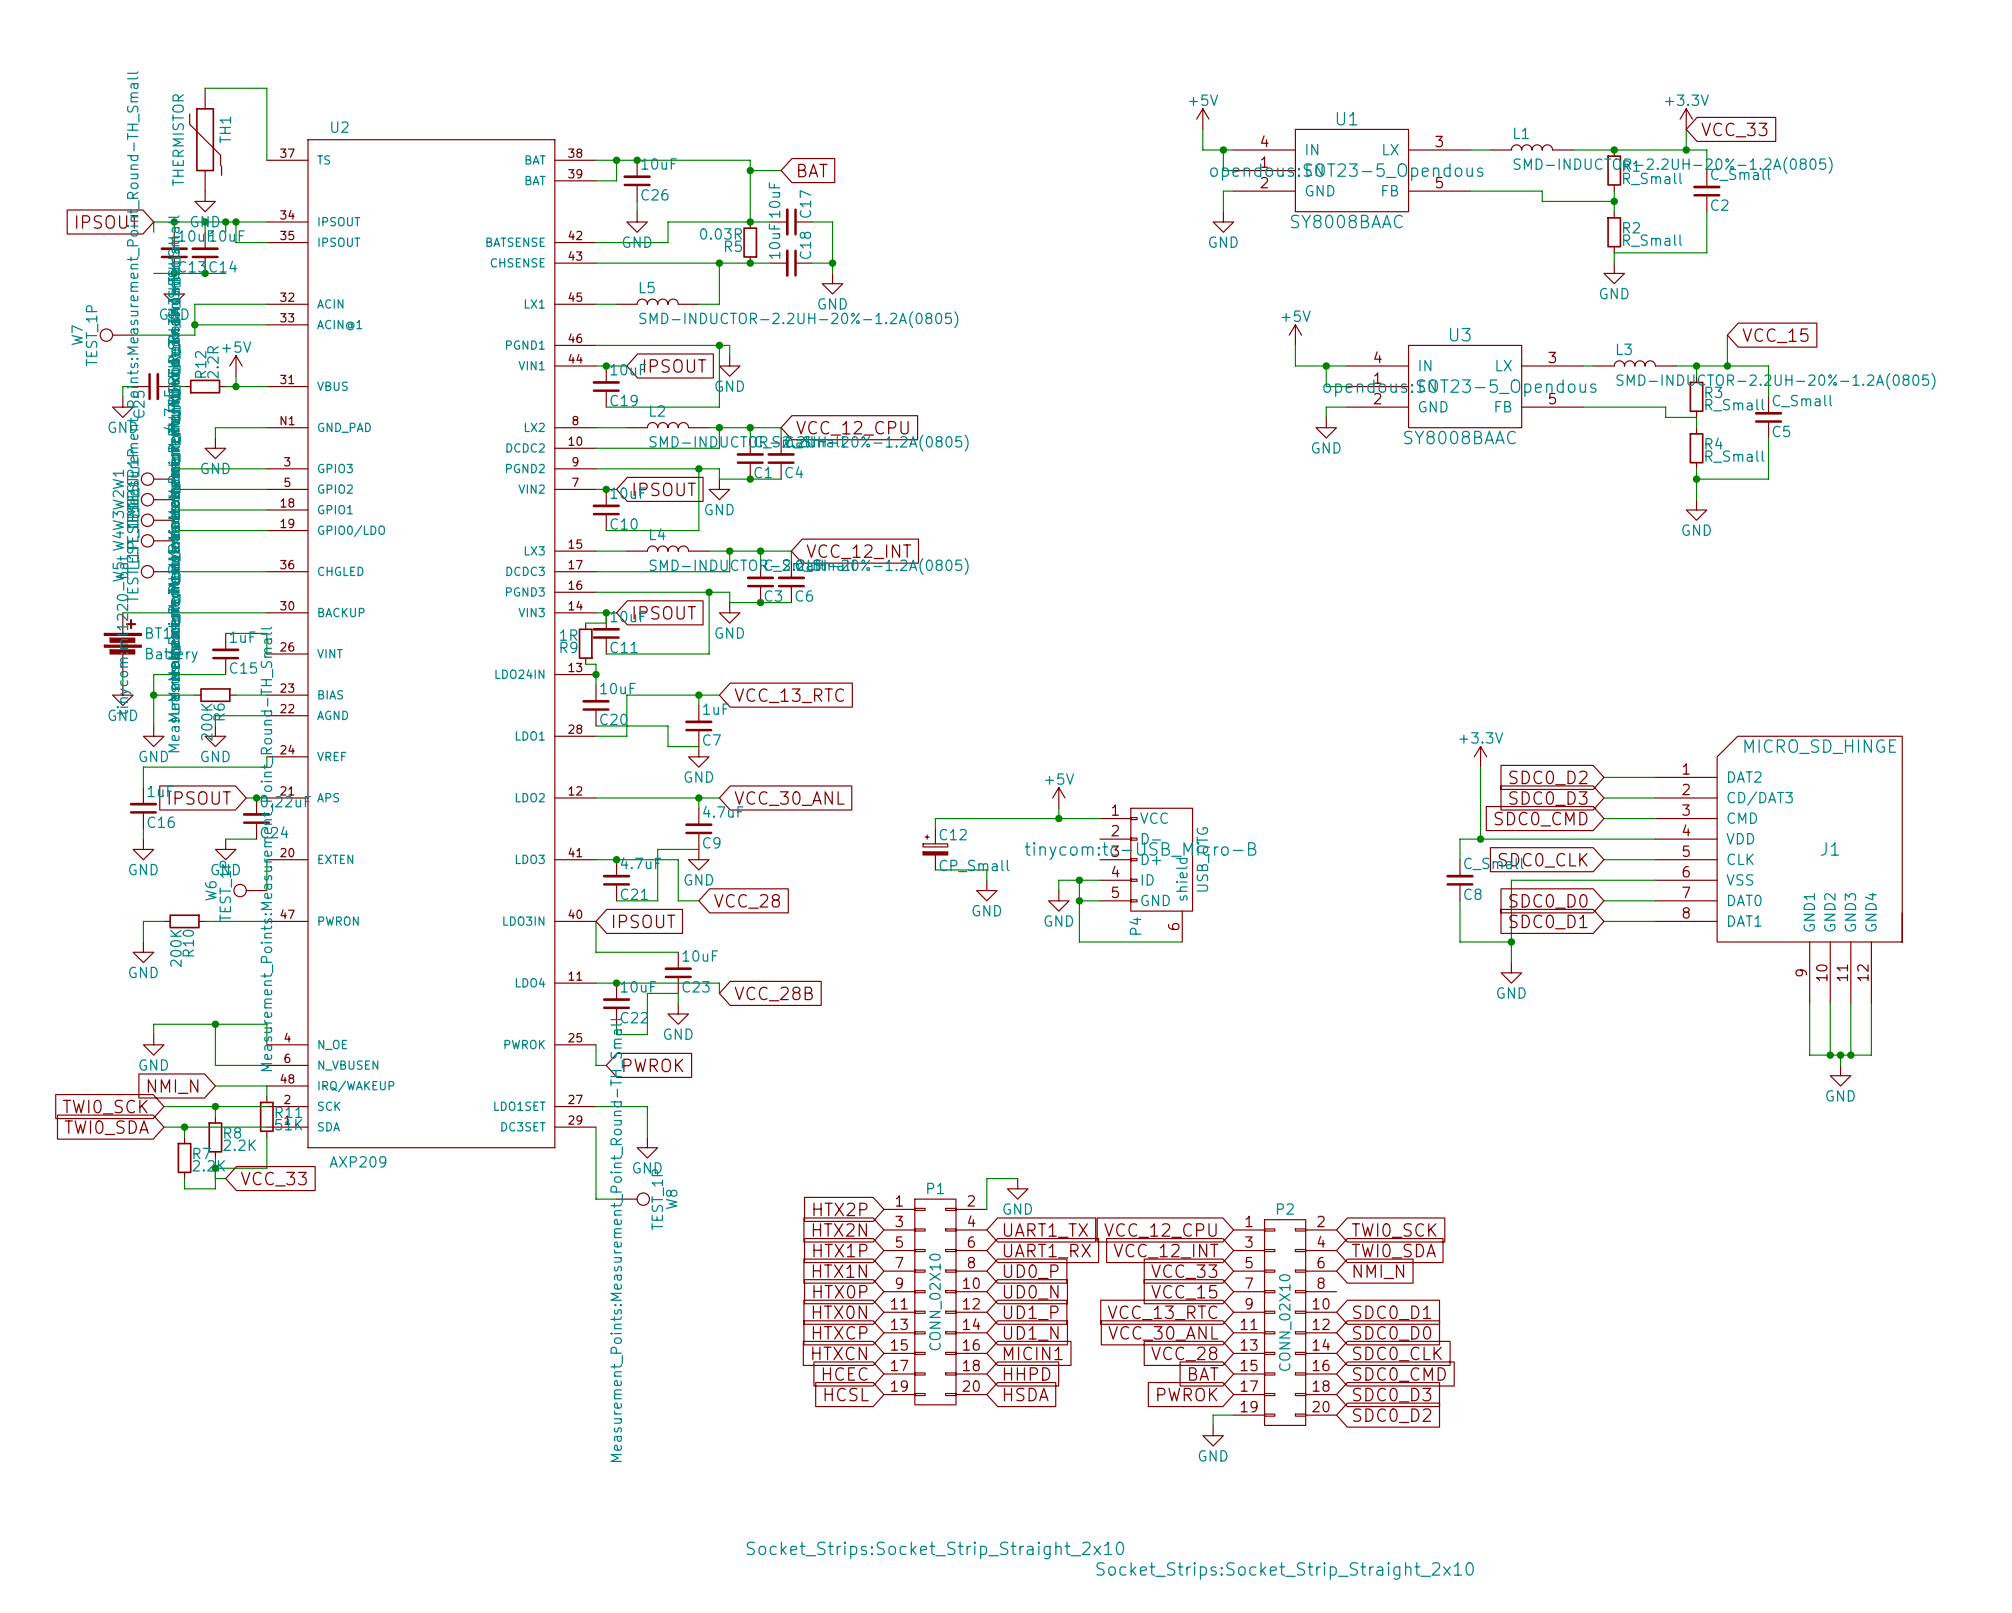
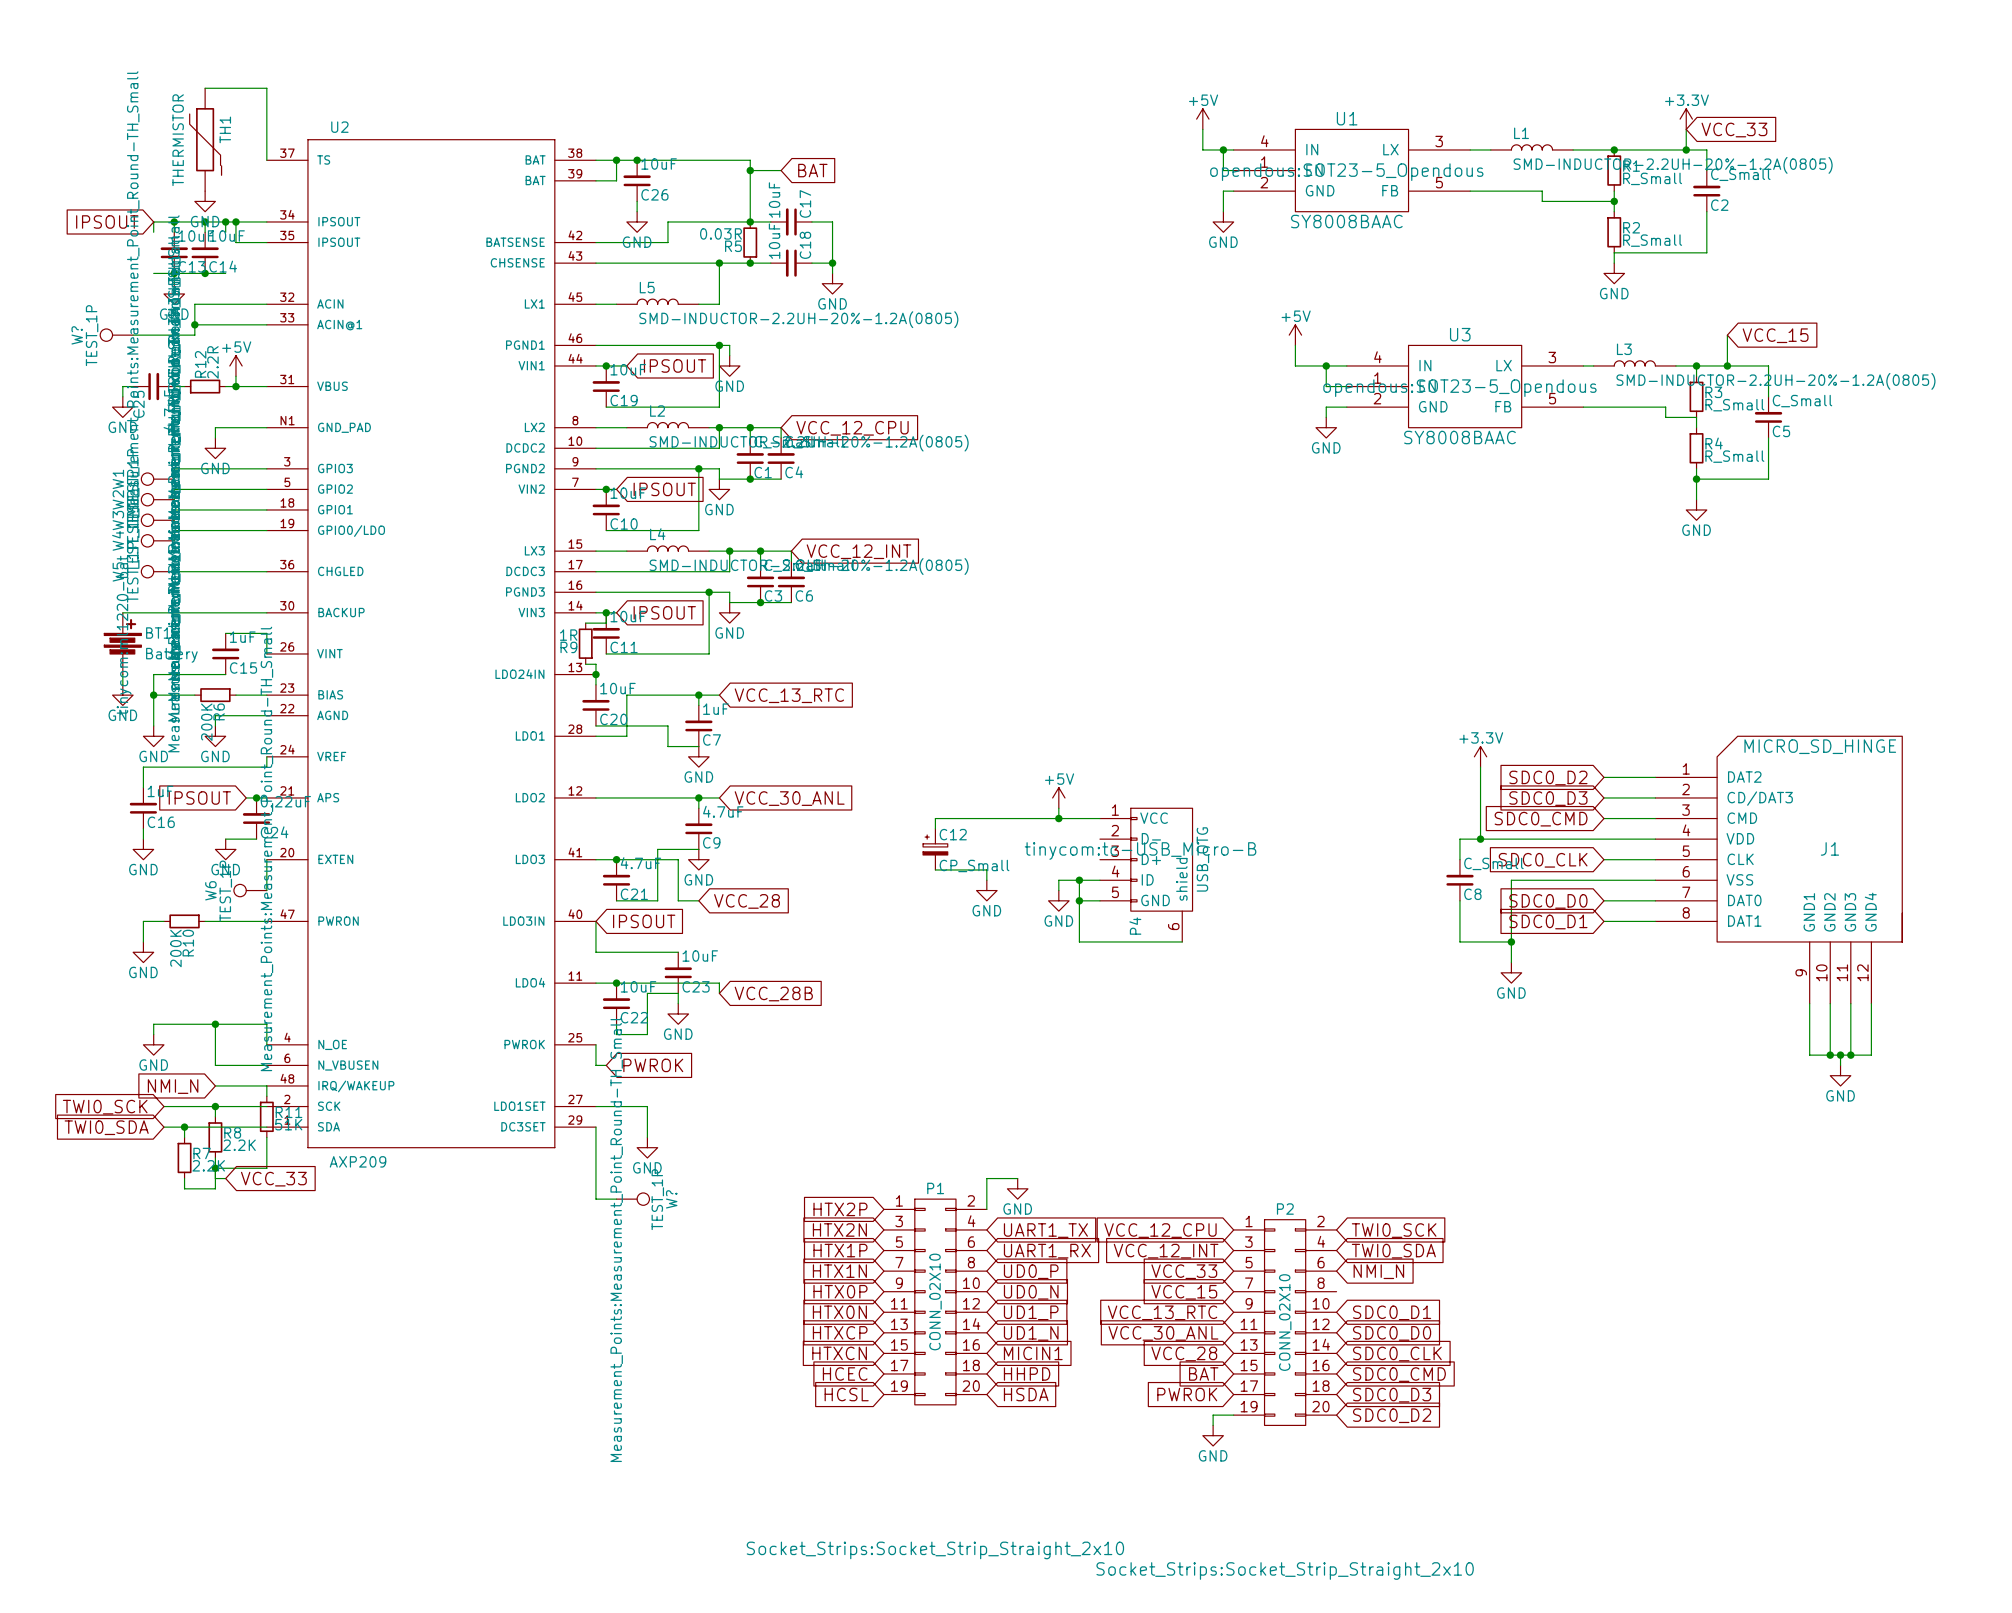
W7 name: W7 (77, 335) -> W? (77, 335)
W8 name: W8 (671, 1199) -> W? (671, 1199)

